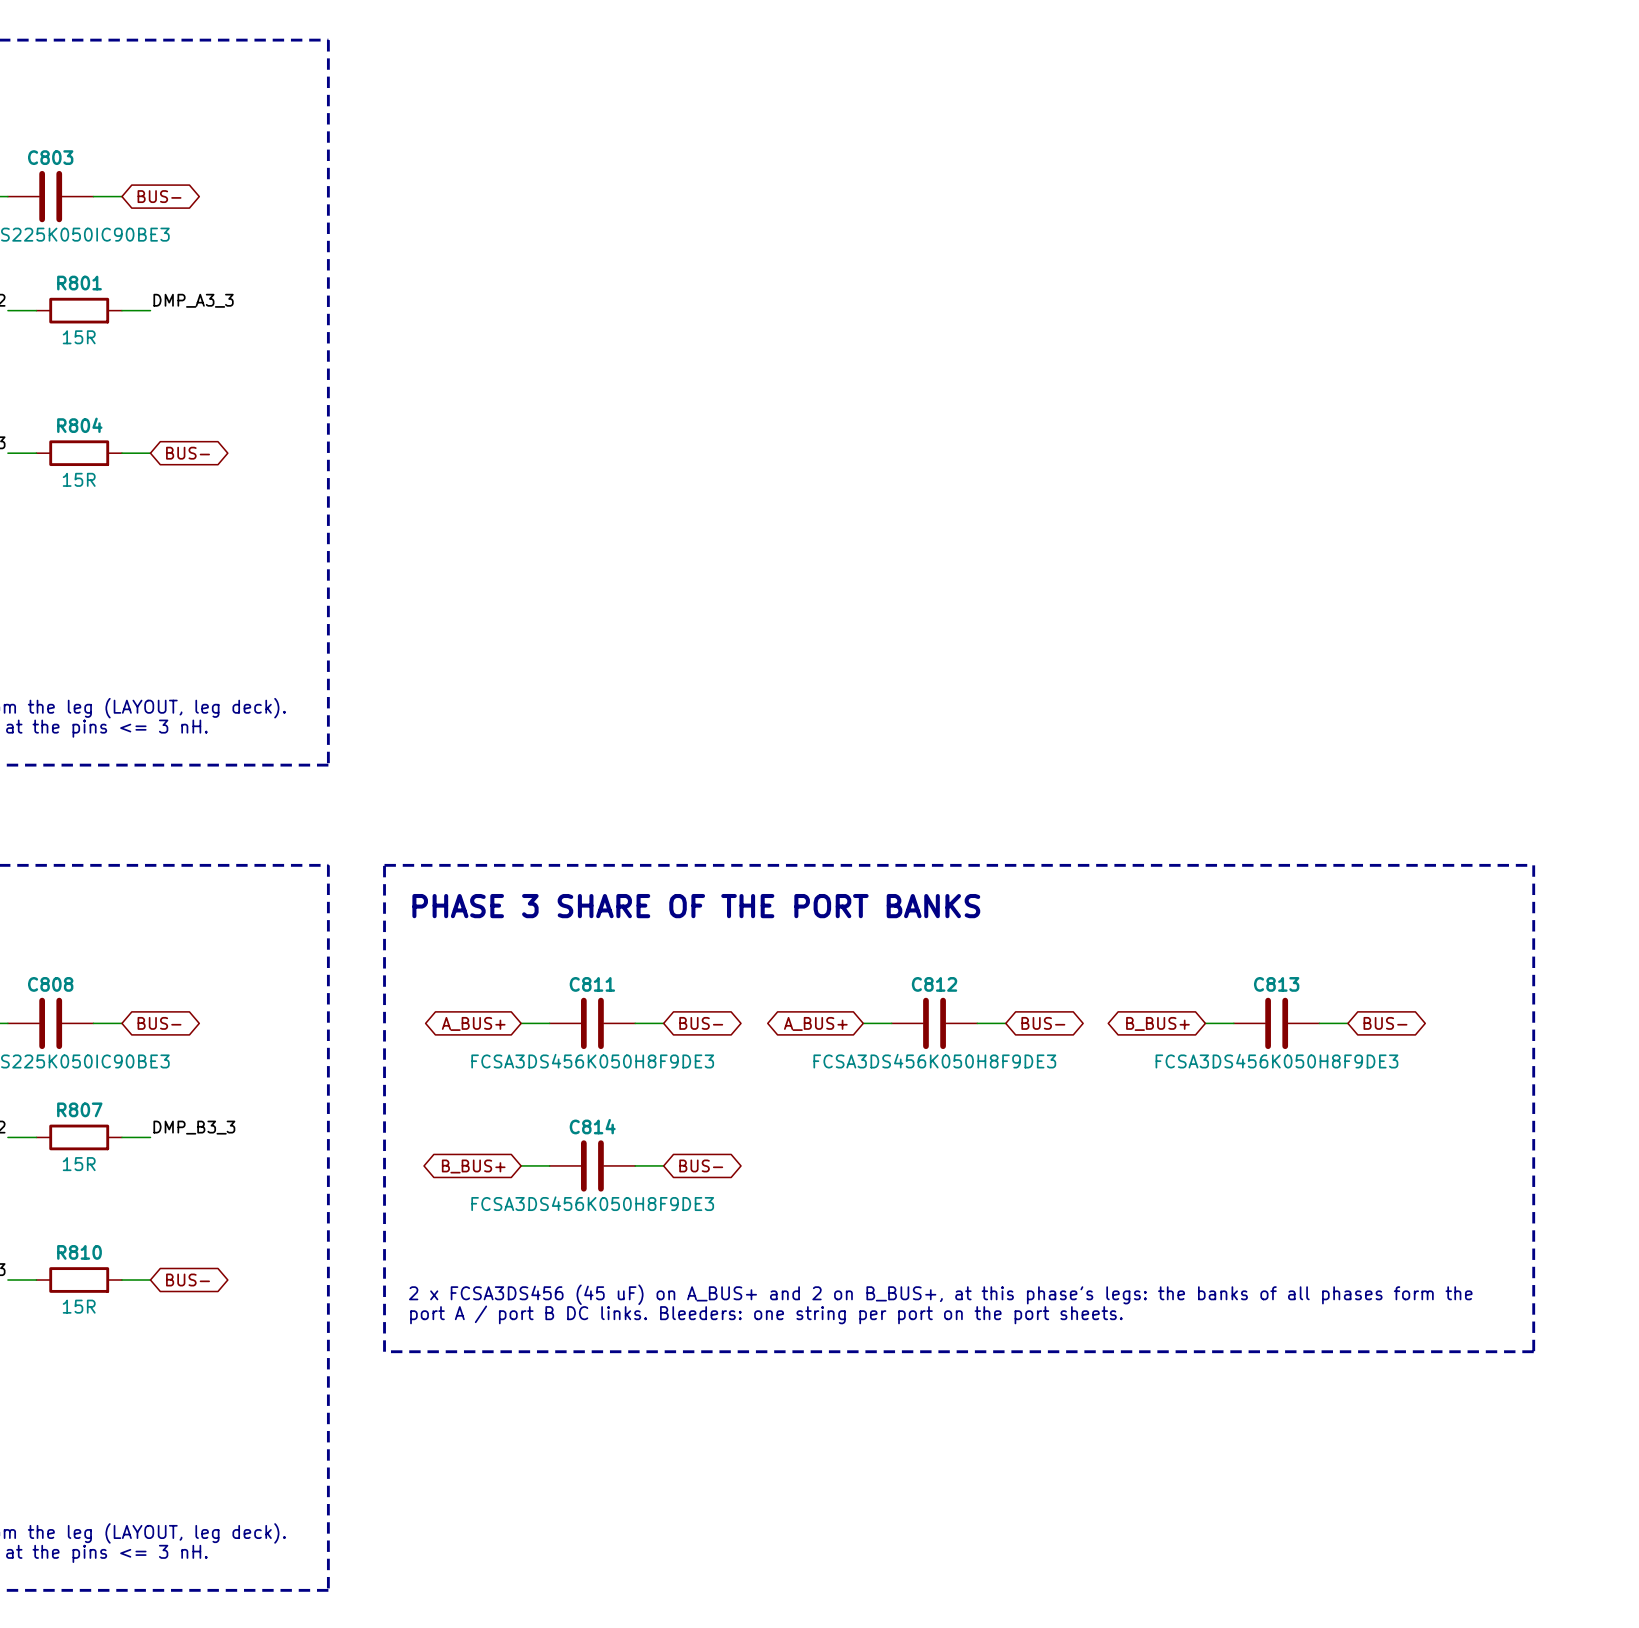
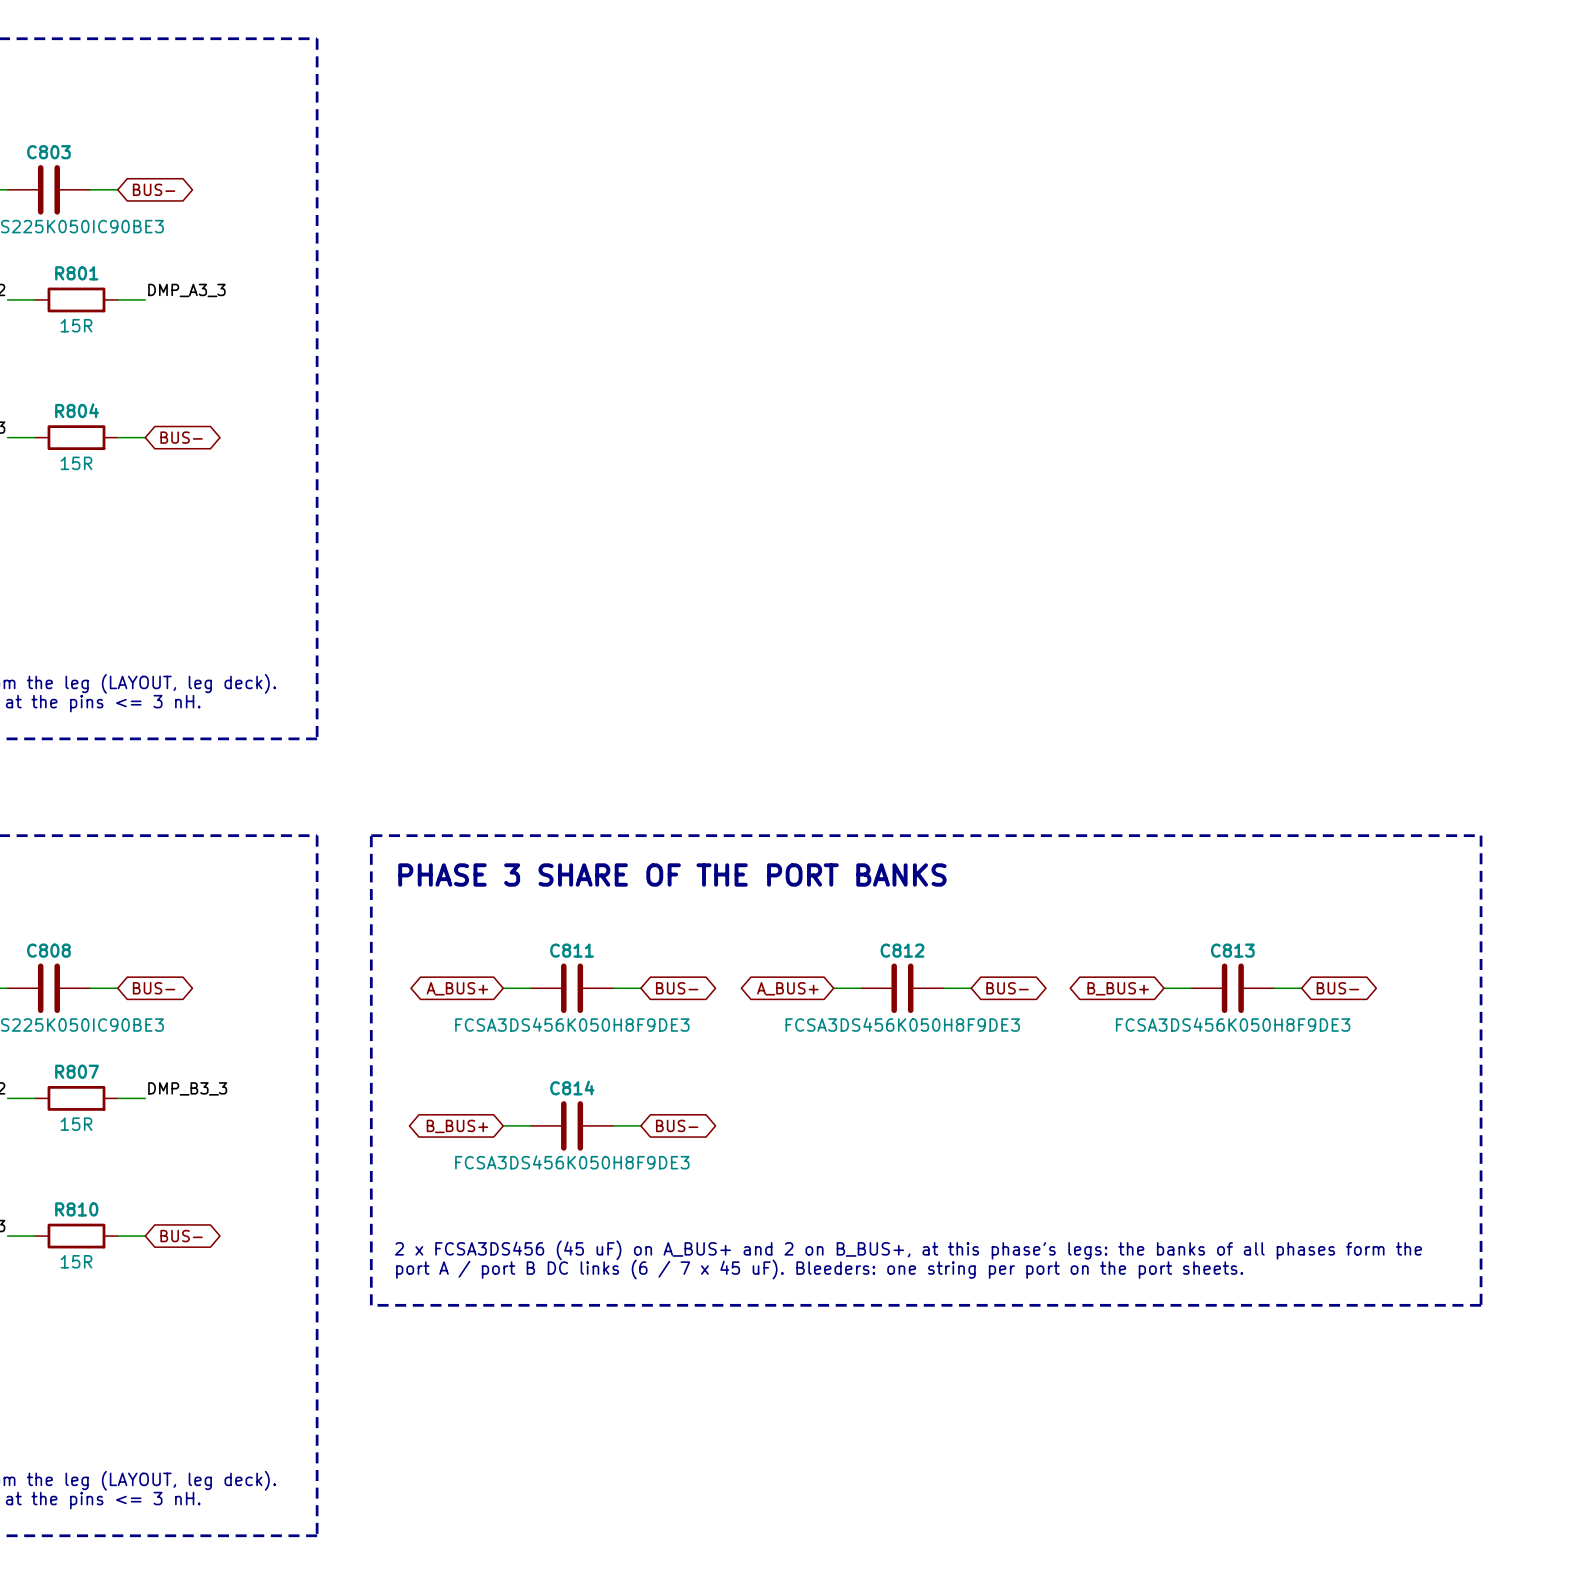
text: port A / port B DC links. Bleeders: one string per port on the port sheets. (766, 1314) -> port A / port B DC links (6 / 7 x 45 uF). Bleeders: one string per port on the port sheets. (819, 1269)

